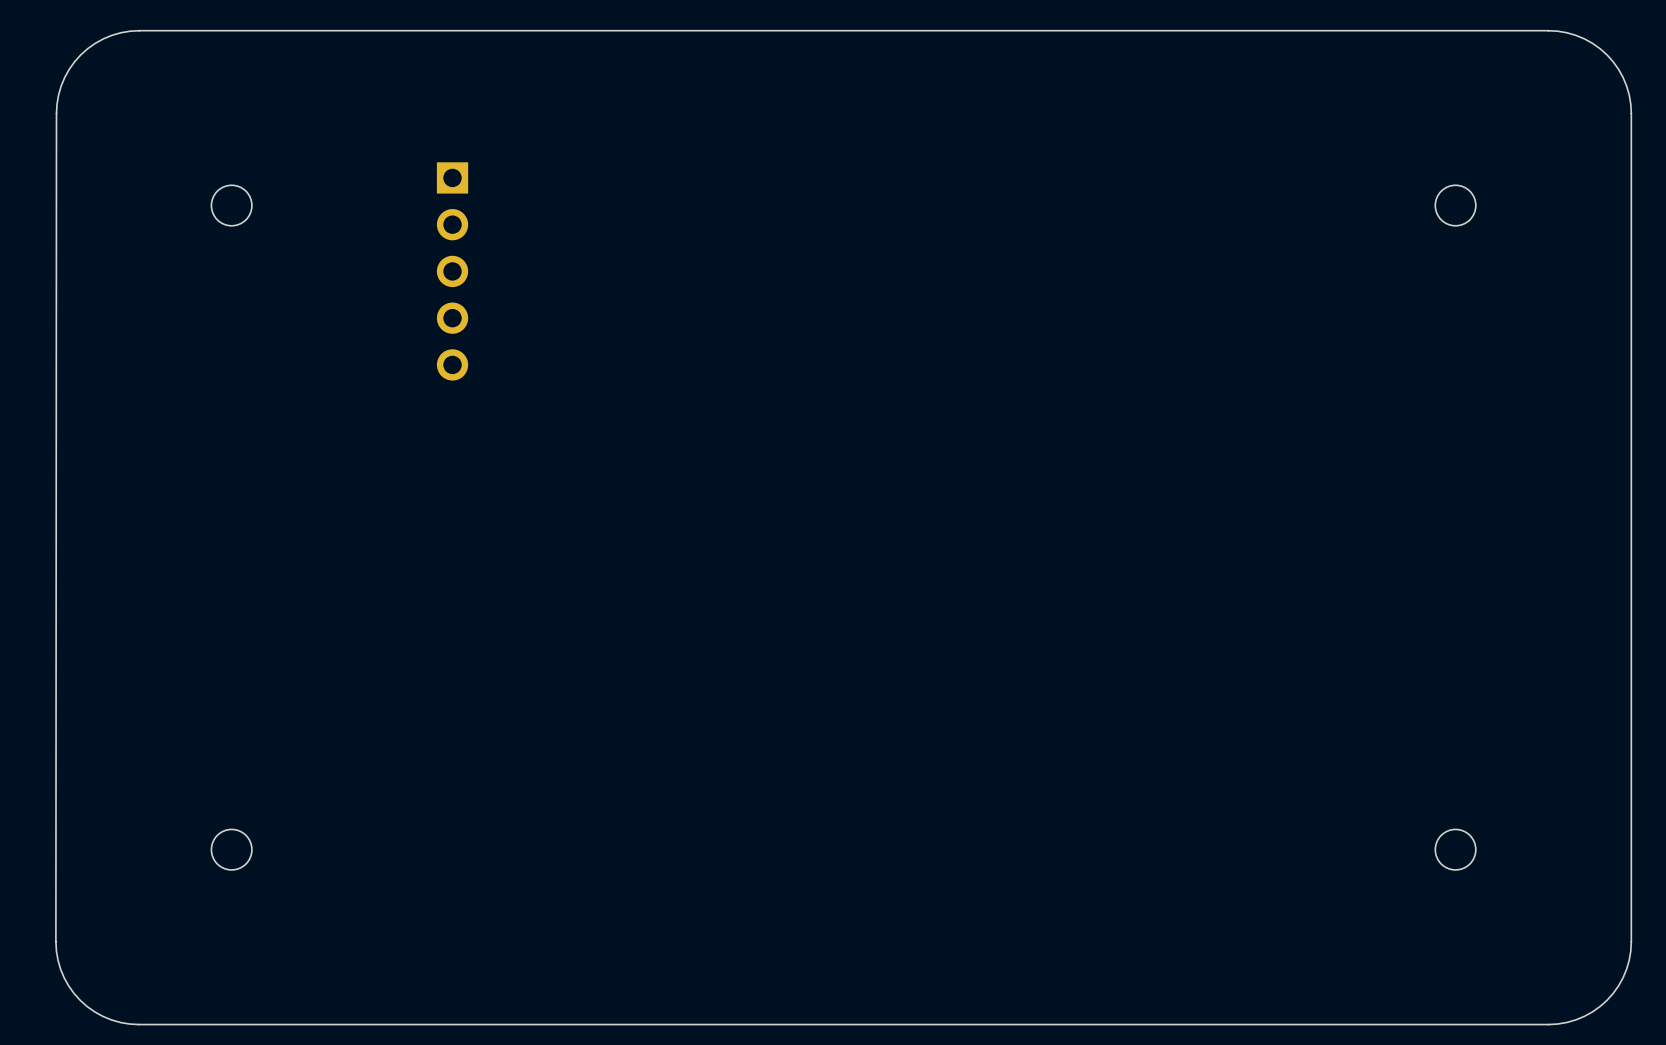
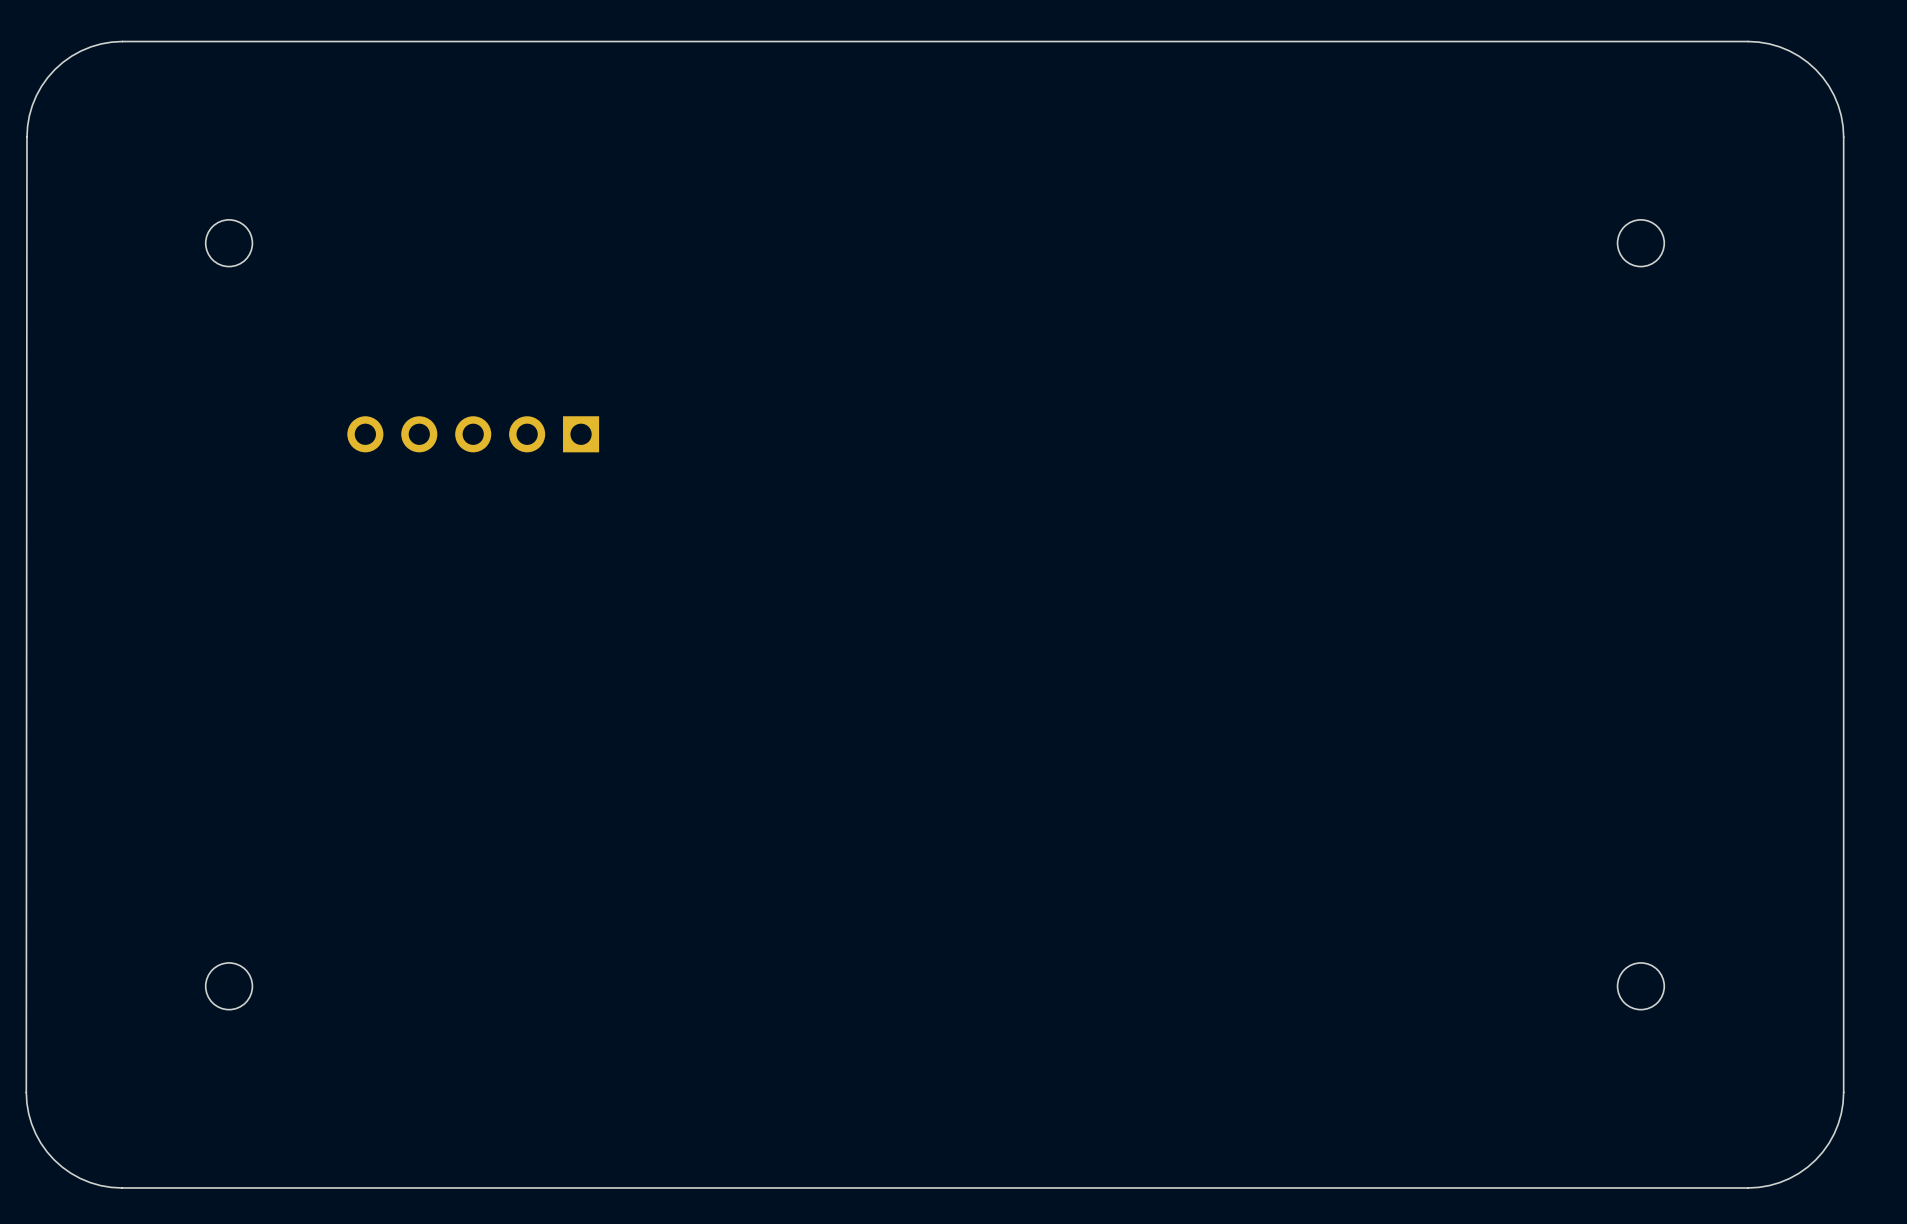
part rotation: 0° (452, 271) -> 90° clockwise (473, 434)

